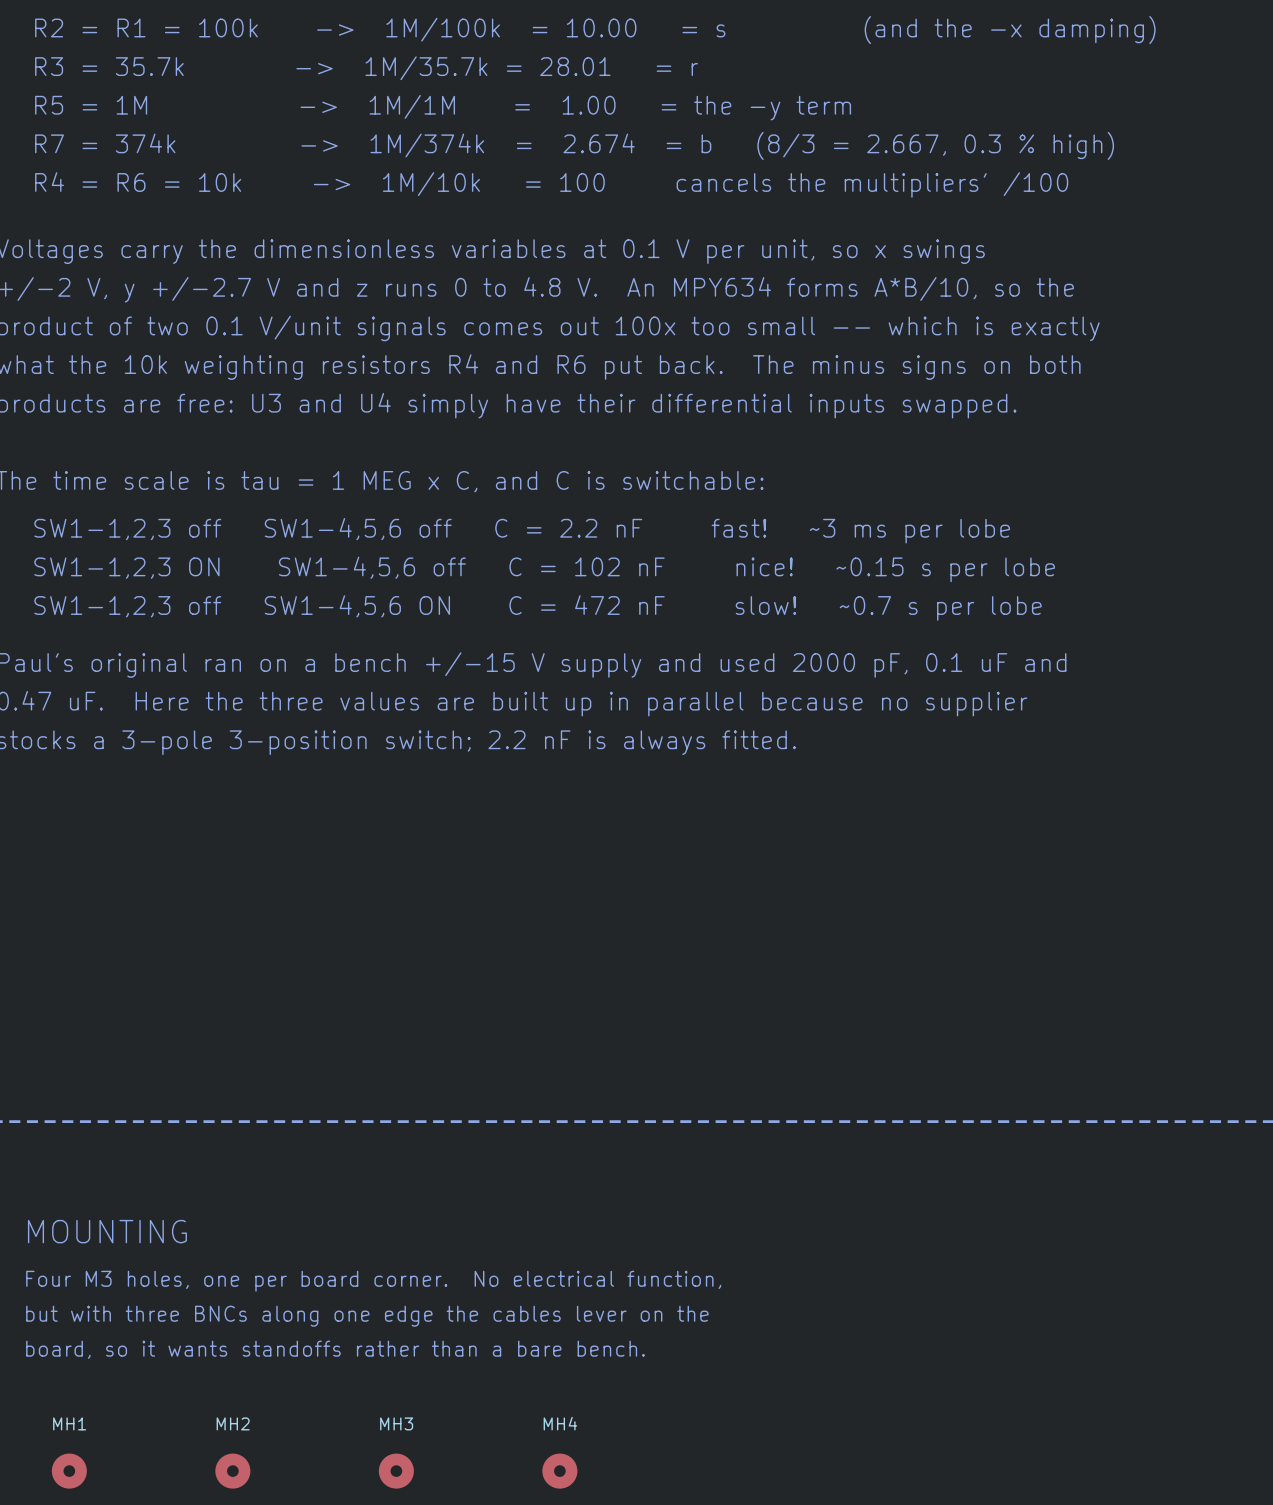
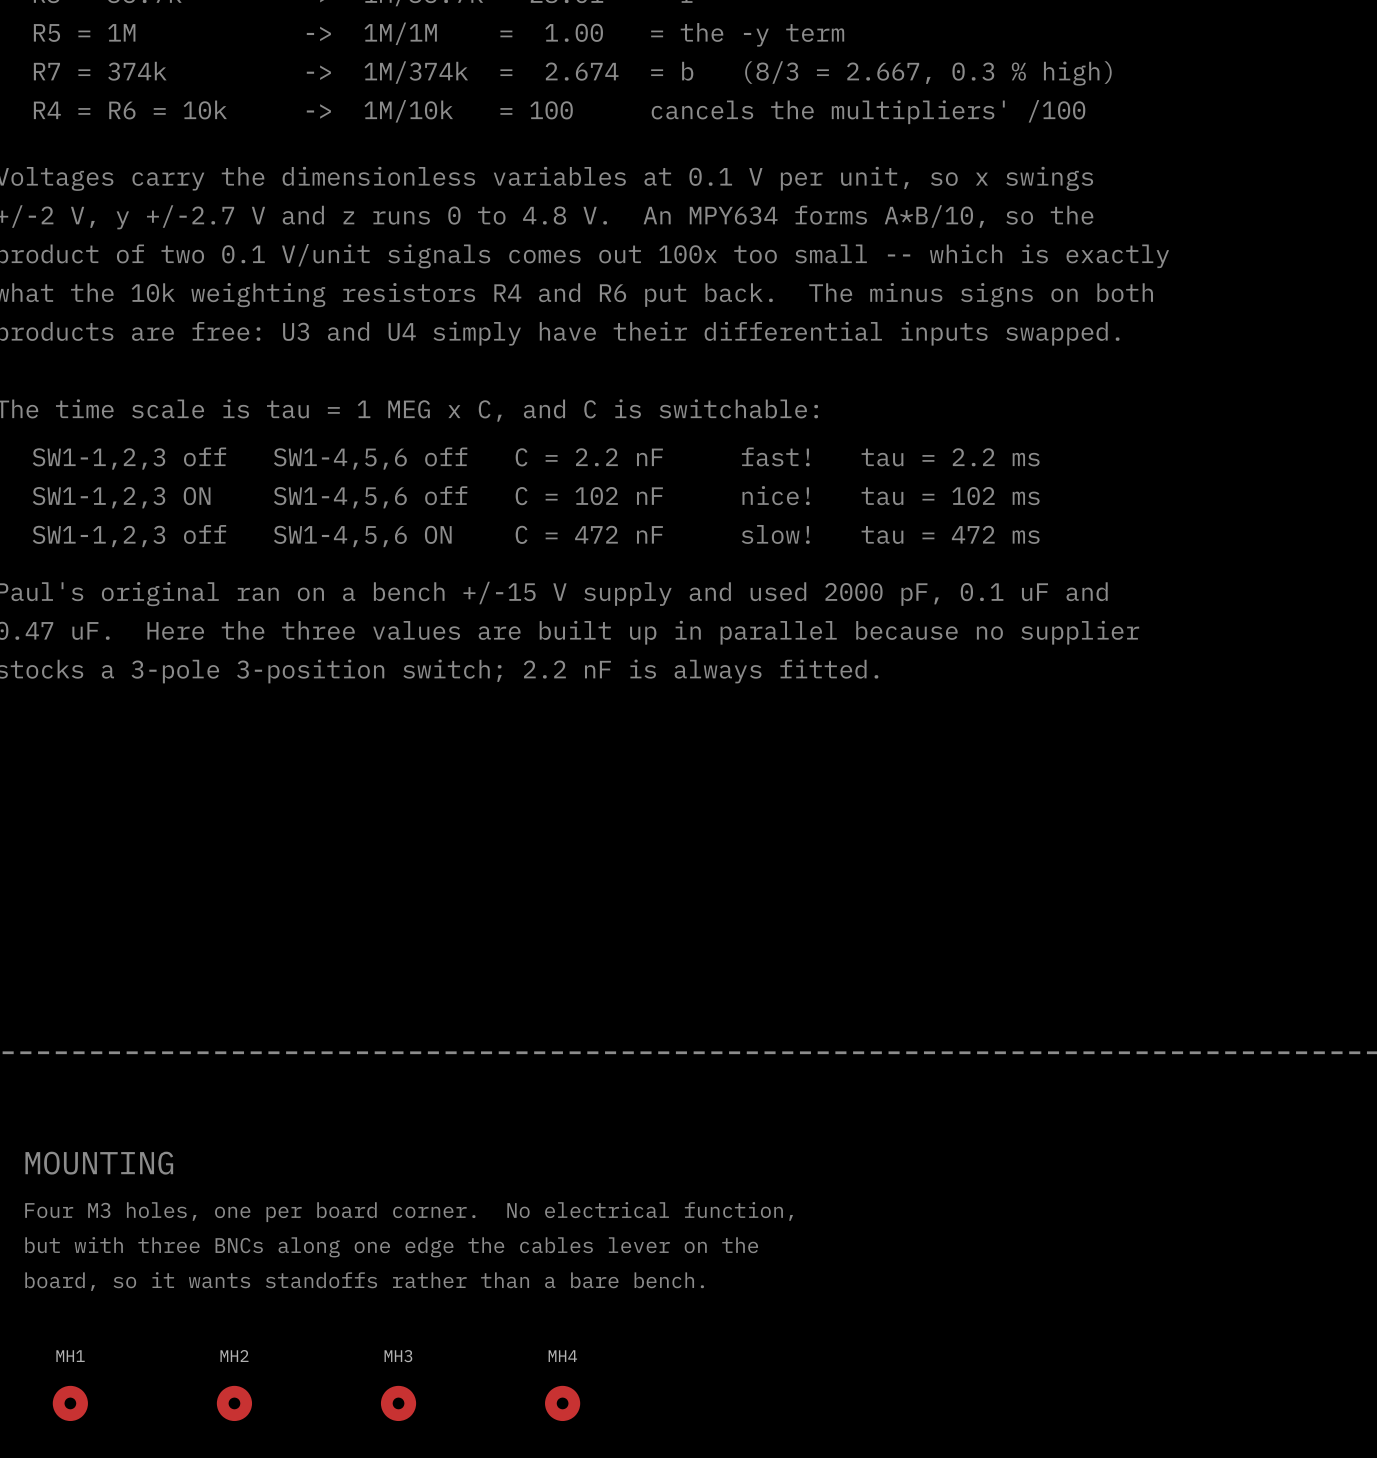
text: SW1-1,2,3 off SW1-4,5,6 off C = 2.2 nF fast! ~3 ms per lobe (522, 530) -> SW1-1,2,3 off SW1-4,5,6 off C = 2.2 nF fast! tau = 2.2 ms (536, 458)
text: SW1-1,2,3 ON SW1-4,5,6 off C = 102 nF nice! ~0.15 s per lobe (544, 569) -> SW1-1,2,3 ON SW1-4,5,6 off C = 102 nF nice! tau = 102 ms (536, 497)
text: SW1-1,2,3 off SW1-4,5,6 ON C = 472 nF slow! ~0.7 s per lobe (537, 608) -> SW1-1,2,3 off SW1-4,5,6 ON C = 472 nF slow! tau = 472 ms (536, 536)

